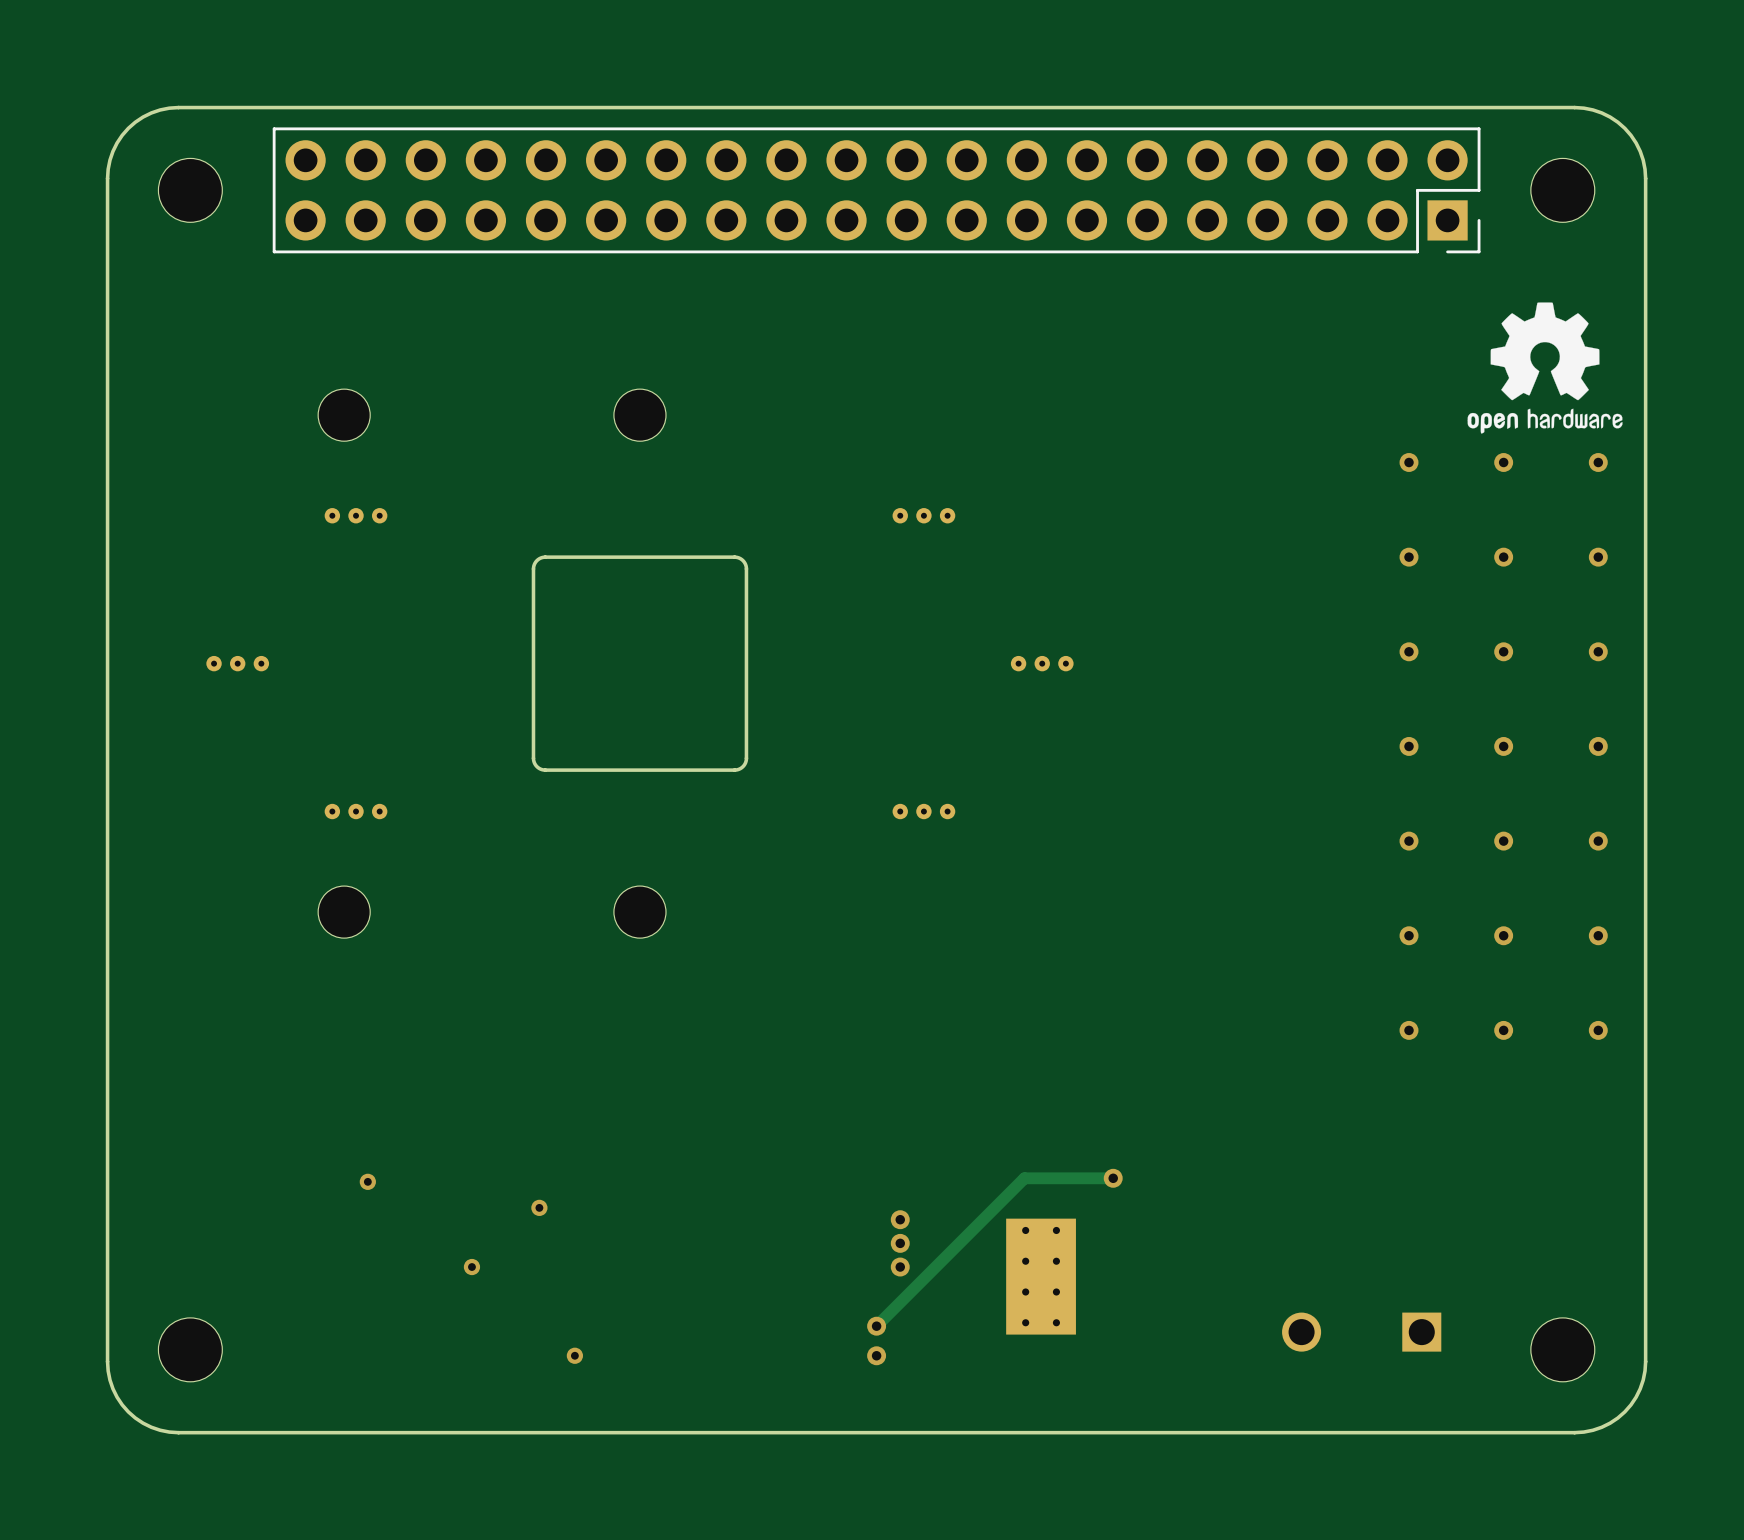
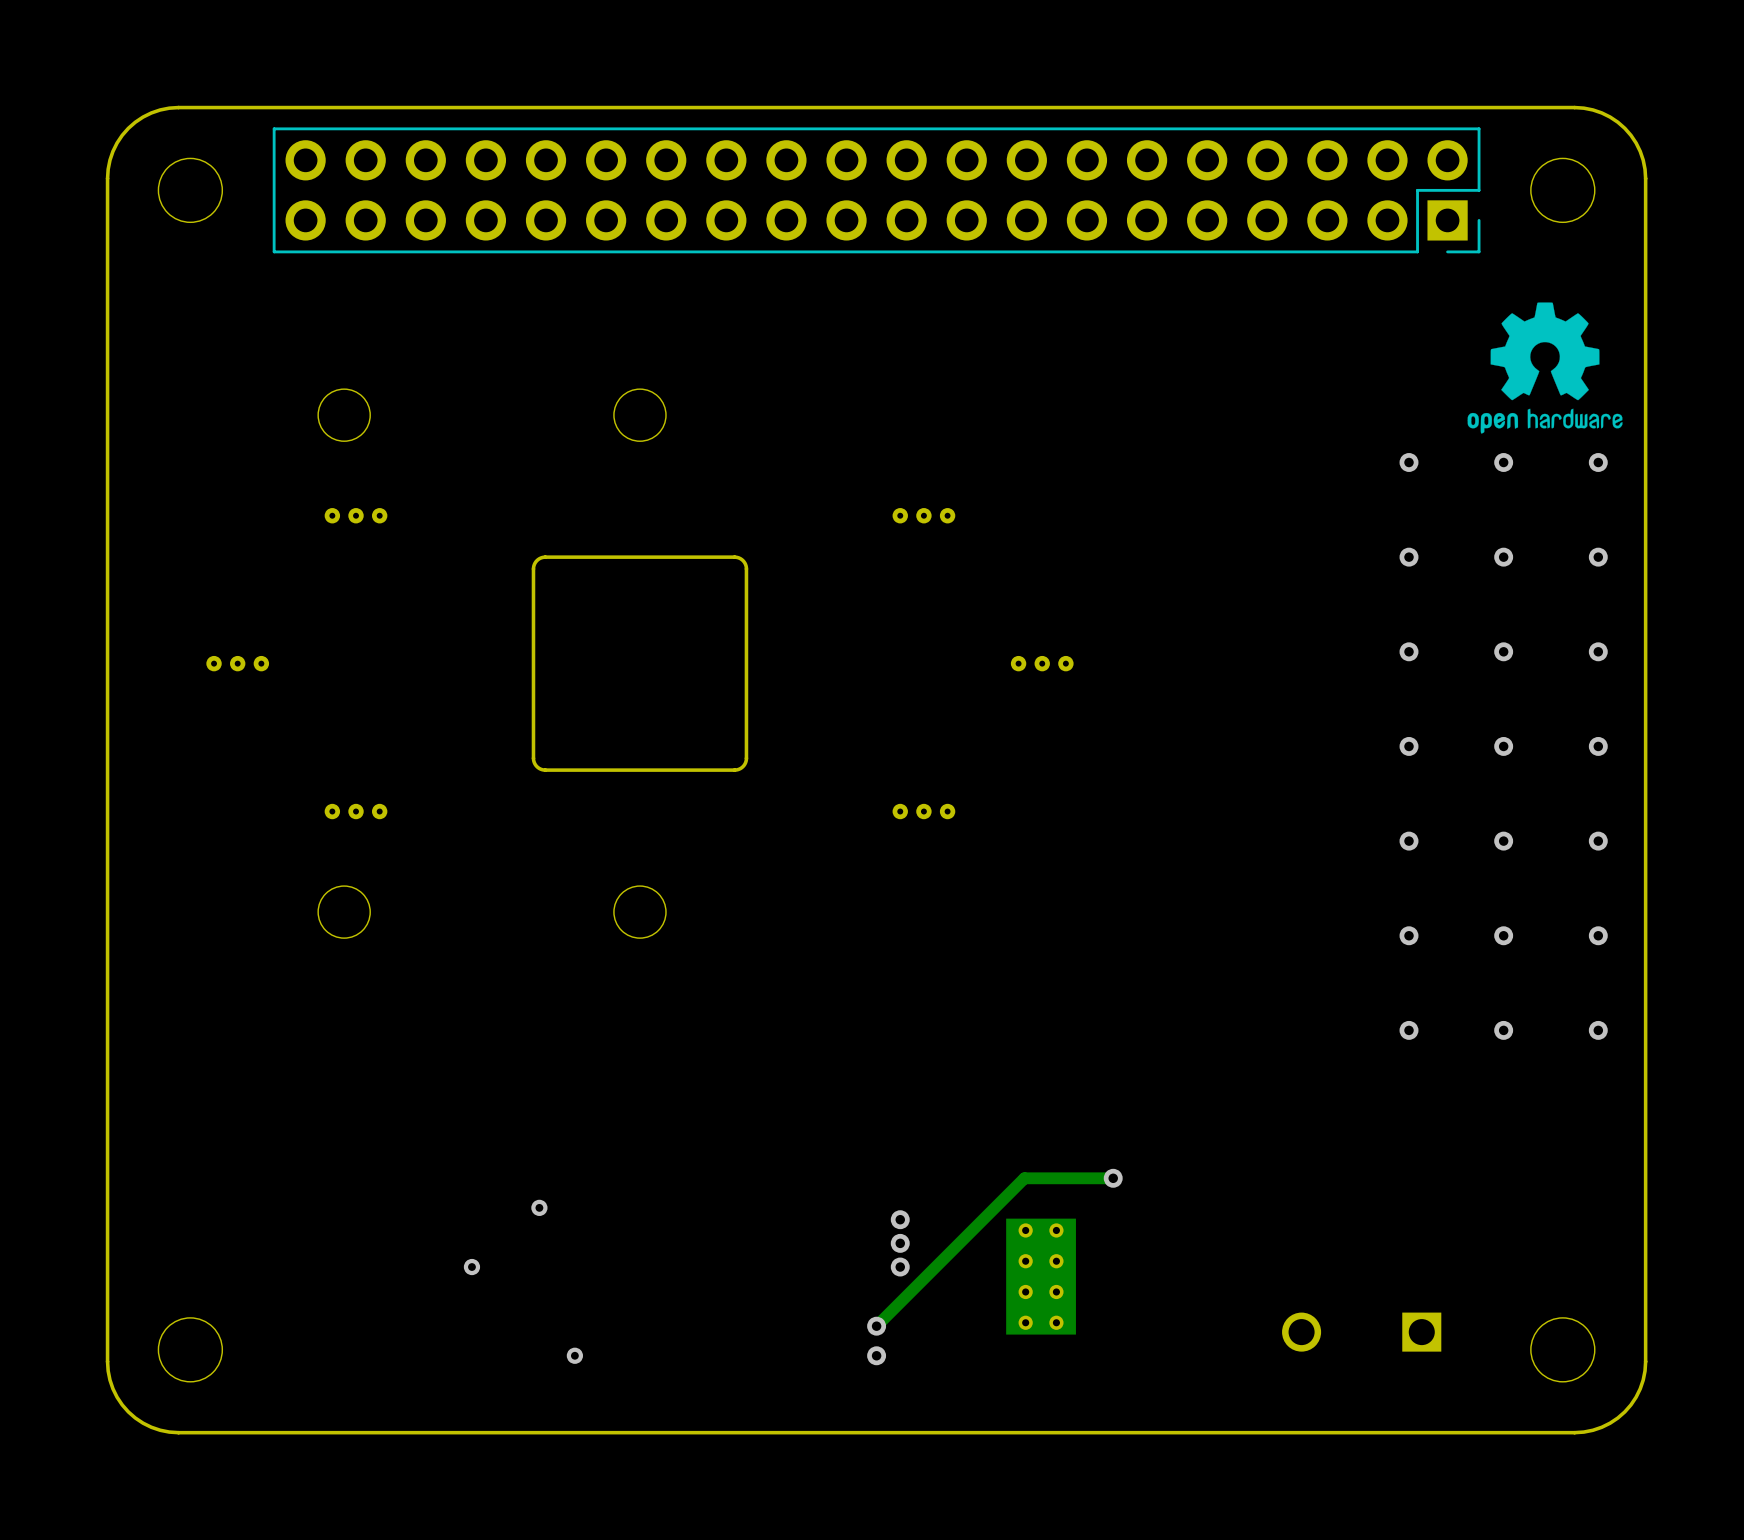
via: (367, 1181) -> none

